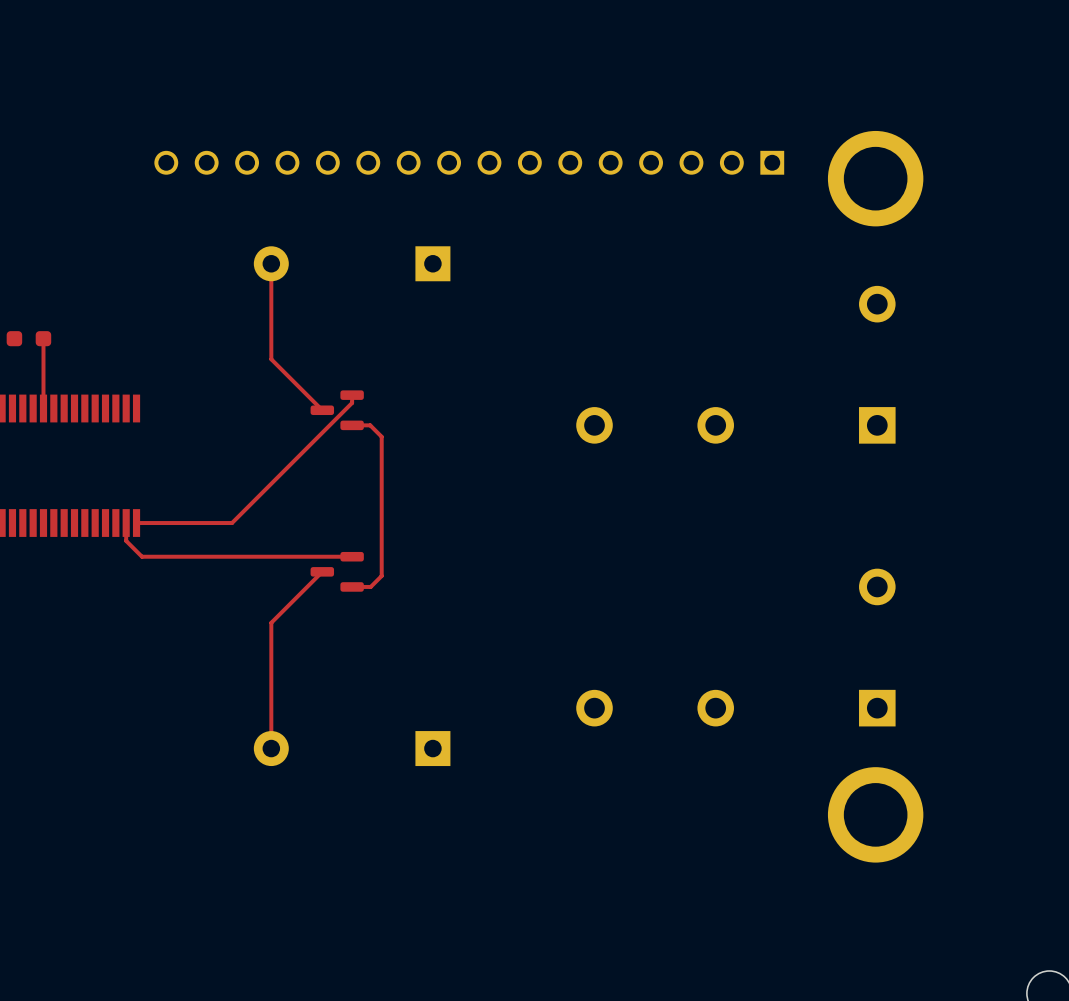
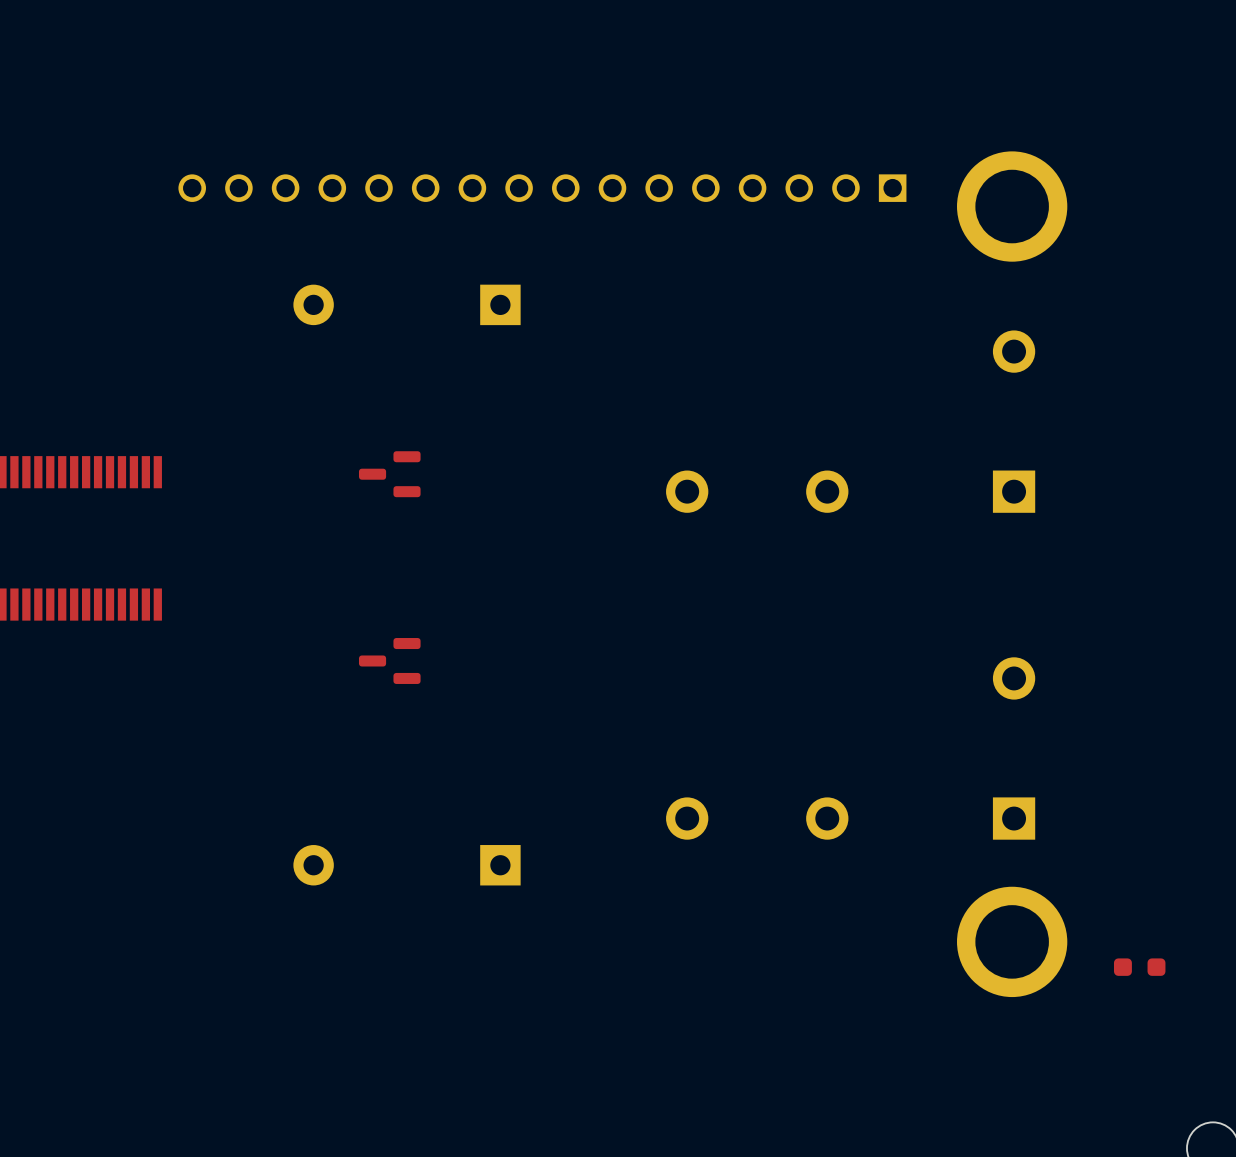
top track: (271, 263) (271, 359) (322, 410) -> none
part: (28, 338) -> none
top track: (43, 338) (43, 408) -> none
top track: (352, 395) (352, 402) (232, 523) (136, 523) -> none
top track: (352, 425) (370, 425) (381, 436) (381, 575) (370, 586) (352, 586) -> none
top track: (126, 523) (126, 540) (142, 556) (352, 556) -> none
top track: (322, 571) (271, 622) (271, 748) -> none
part: none -> (1139, 967)

